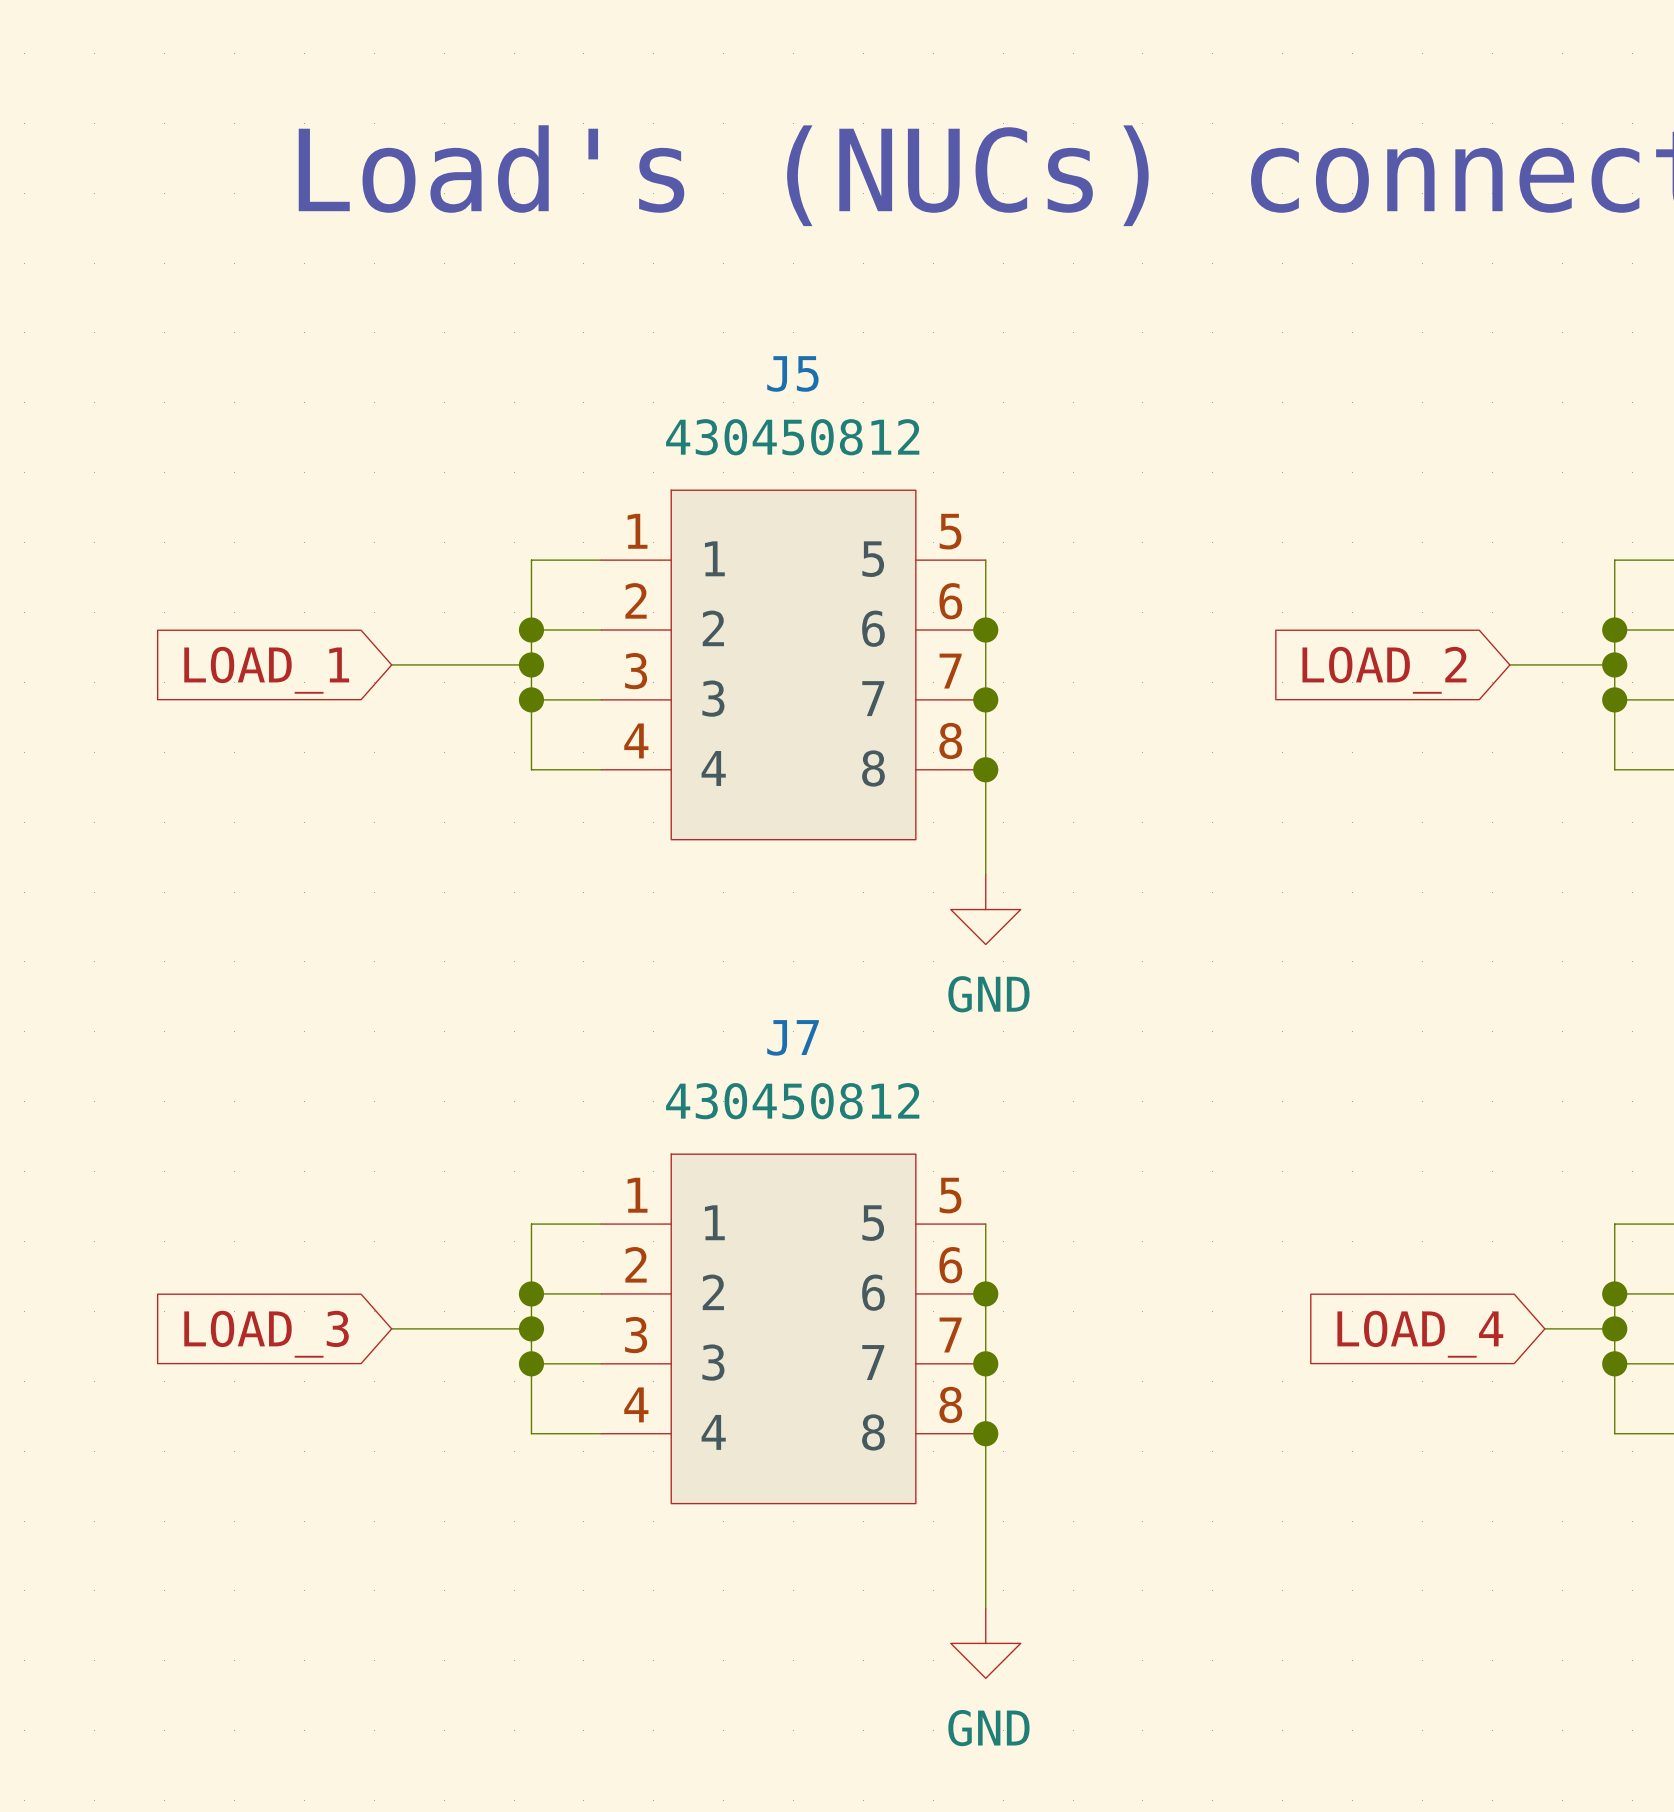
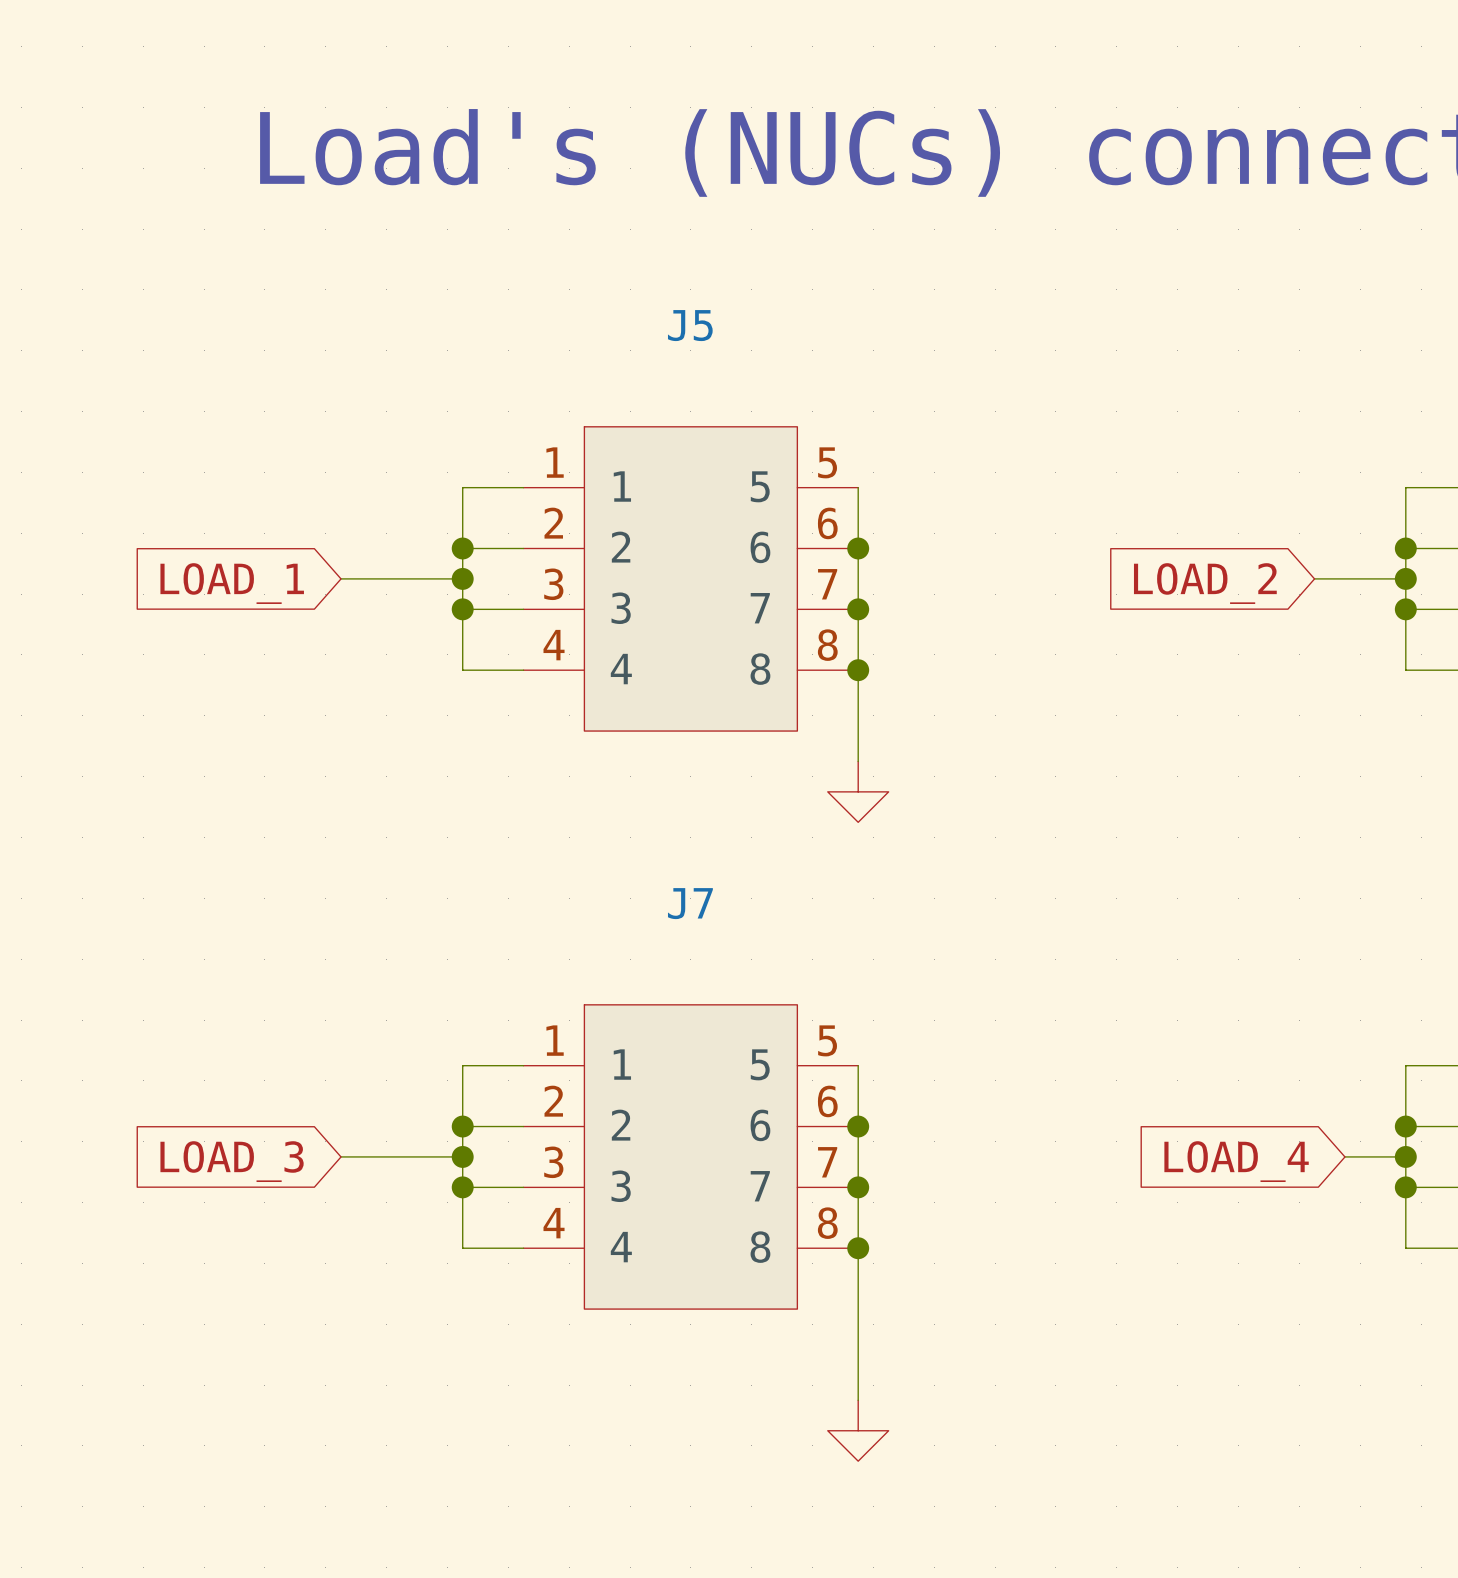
J5 value: 430450812 (792, 437) -> none
power symbol text: GND (988, 994) -> none
J7 value: 430450812 (792, 1101) -> none
power symbol text: GND (988, 1728) -> none

